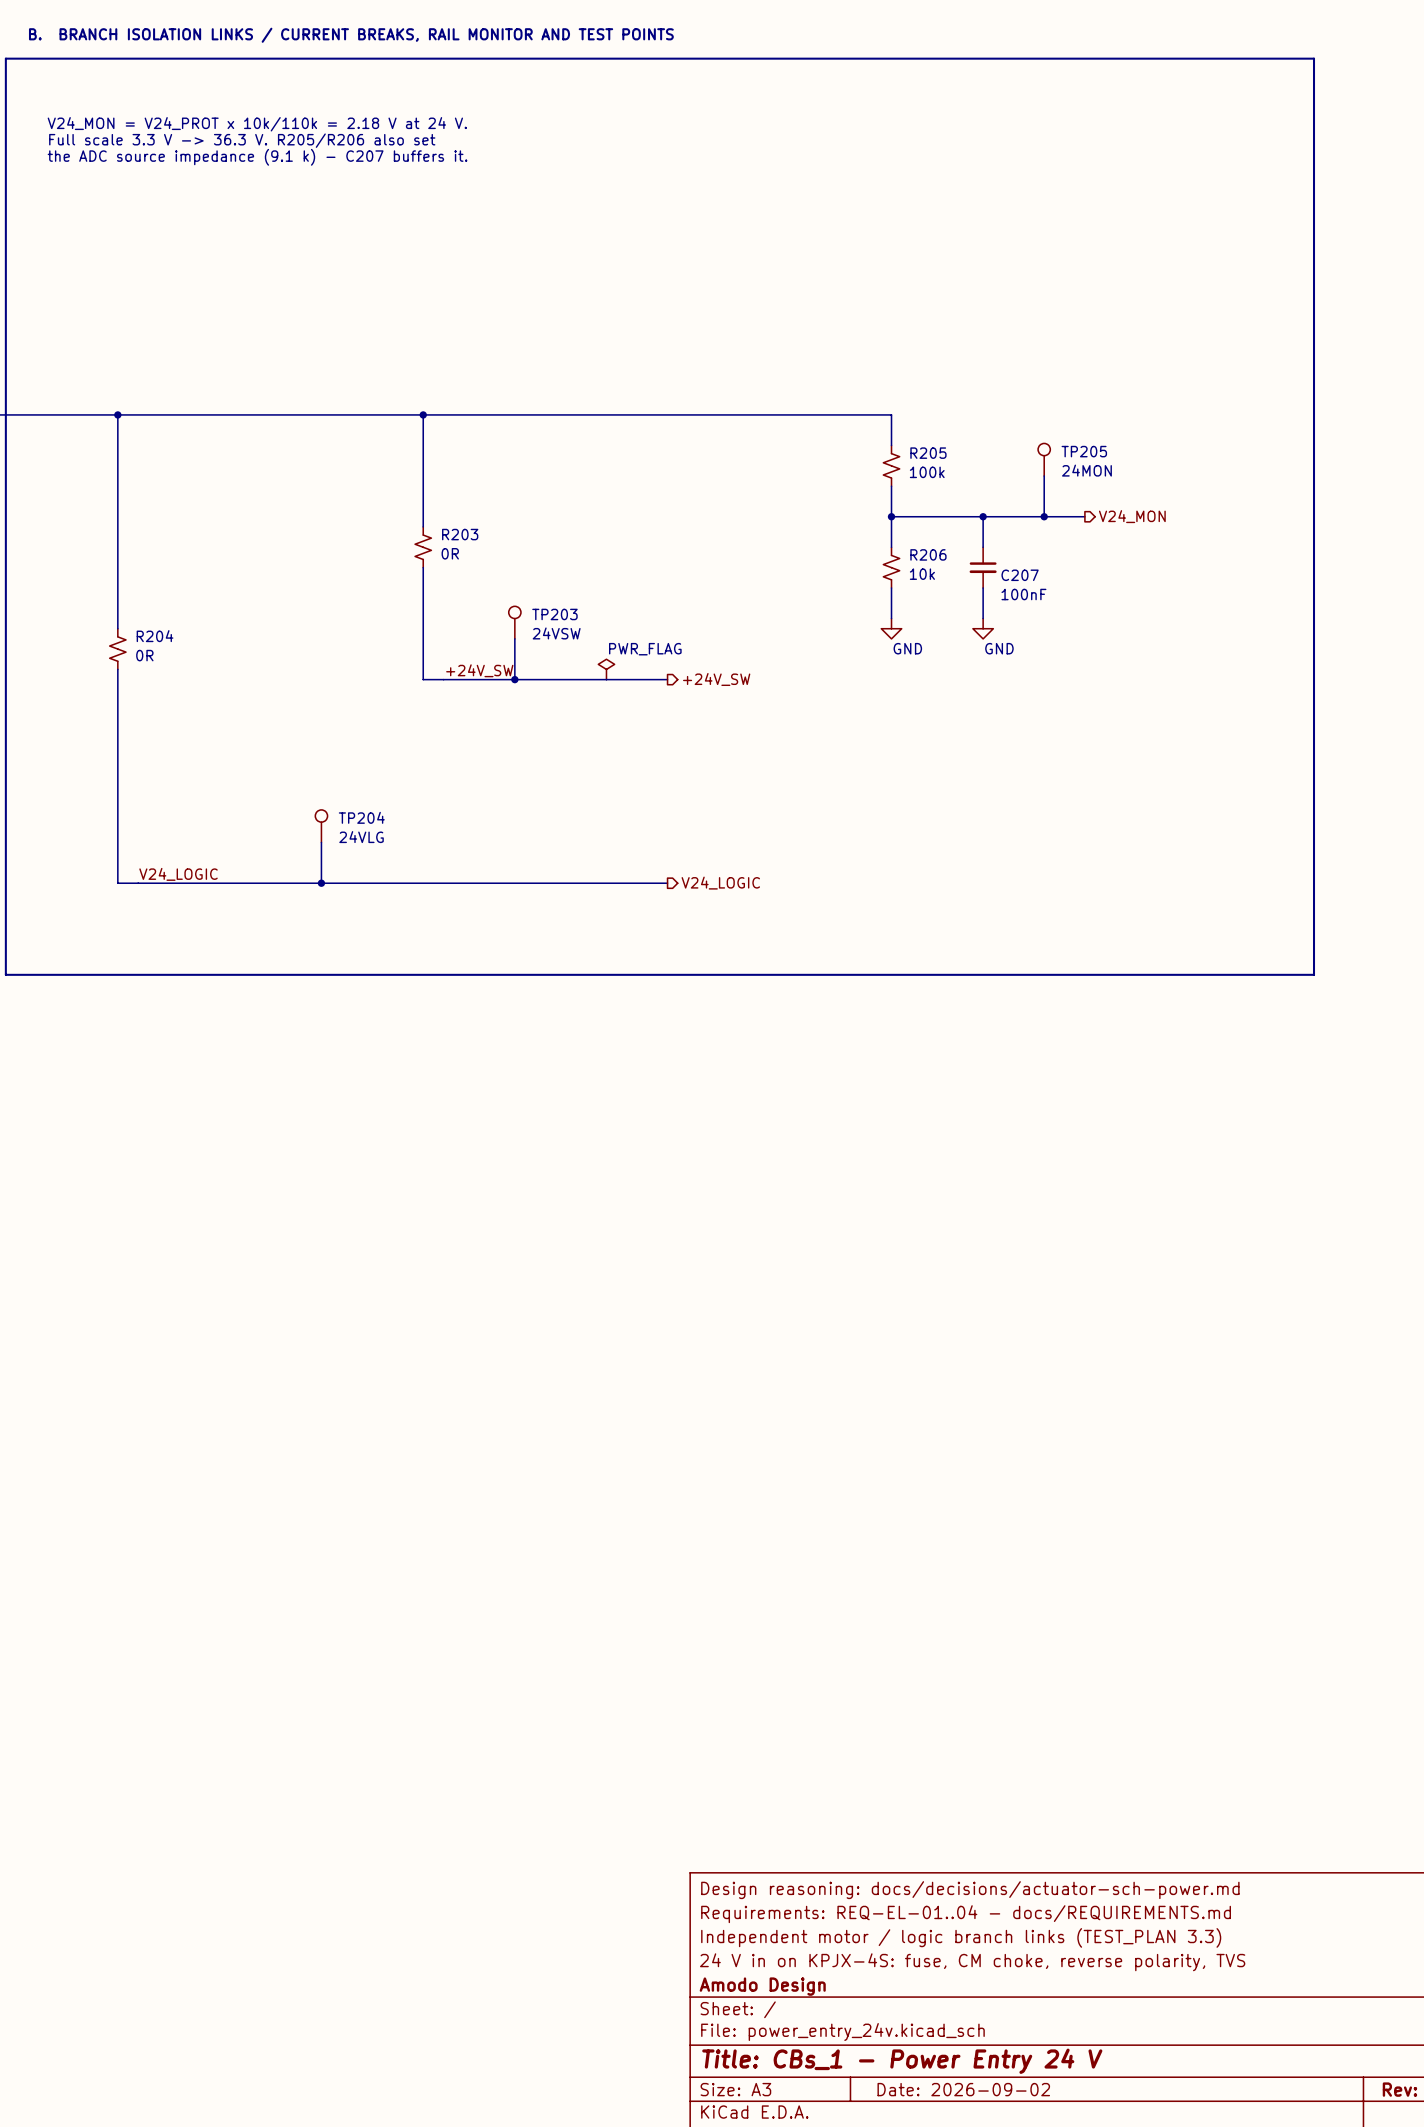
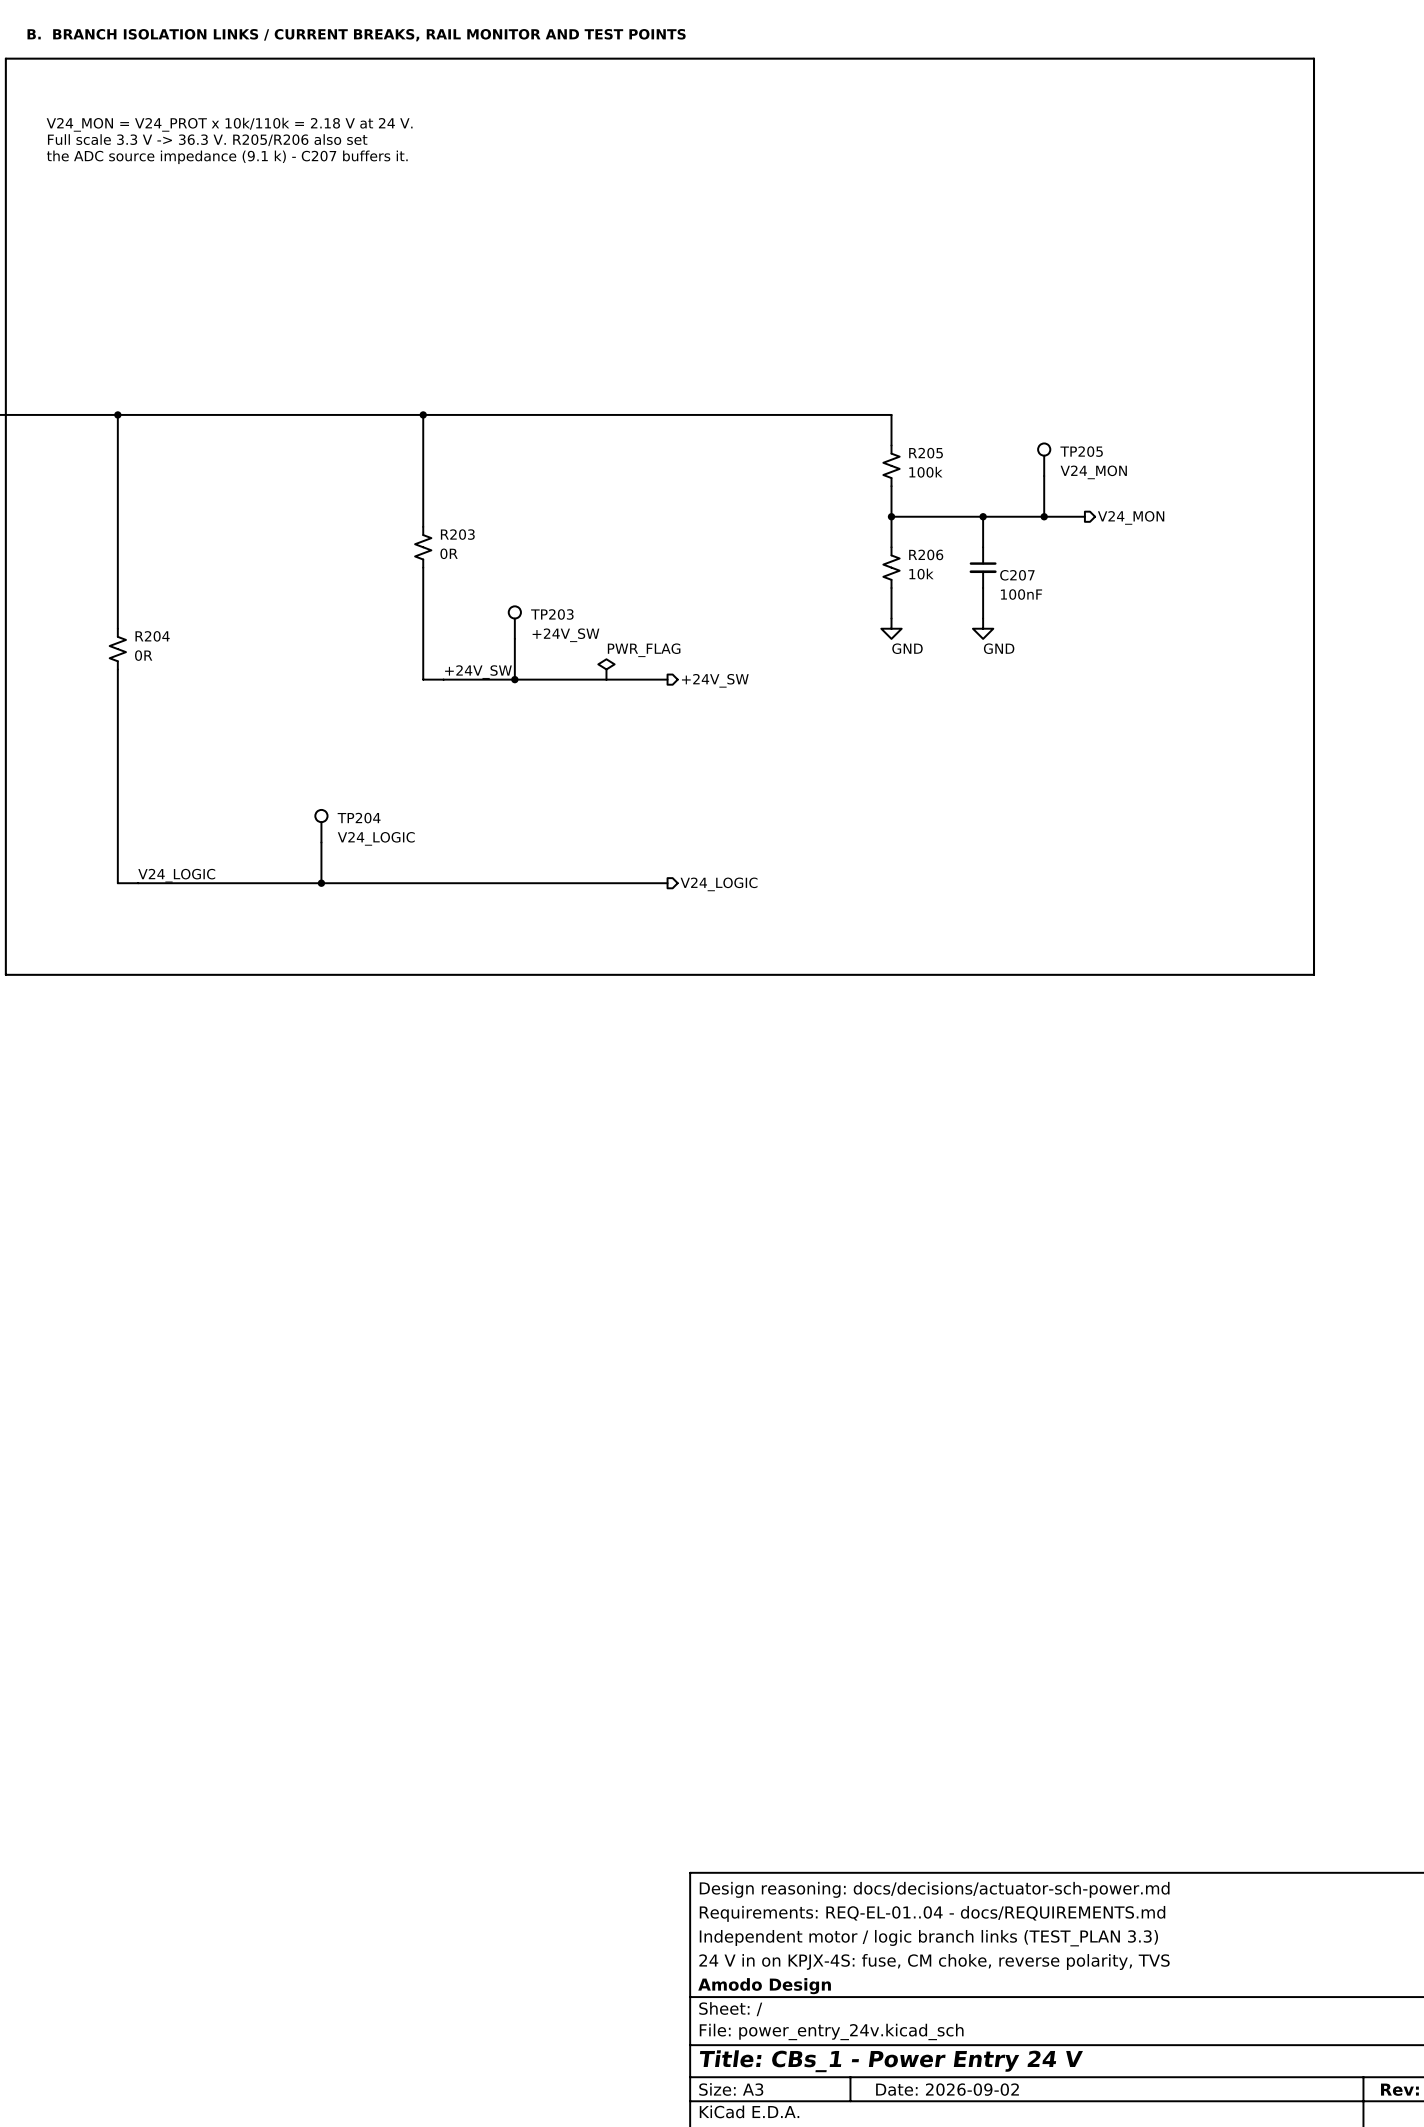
TP205 value: 24MON (1086, 470) -> V24_MON (1093, 472)
TP203 value: 24VSW (556, 633) -> +24V_SW (565, 635)
TP204 value: 24VLG (361, 837) -> V24_LOGIC (376, 838)

